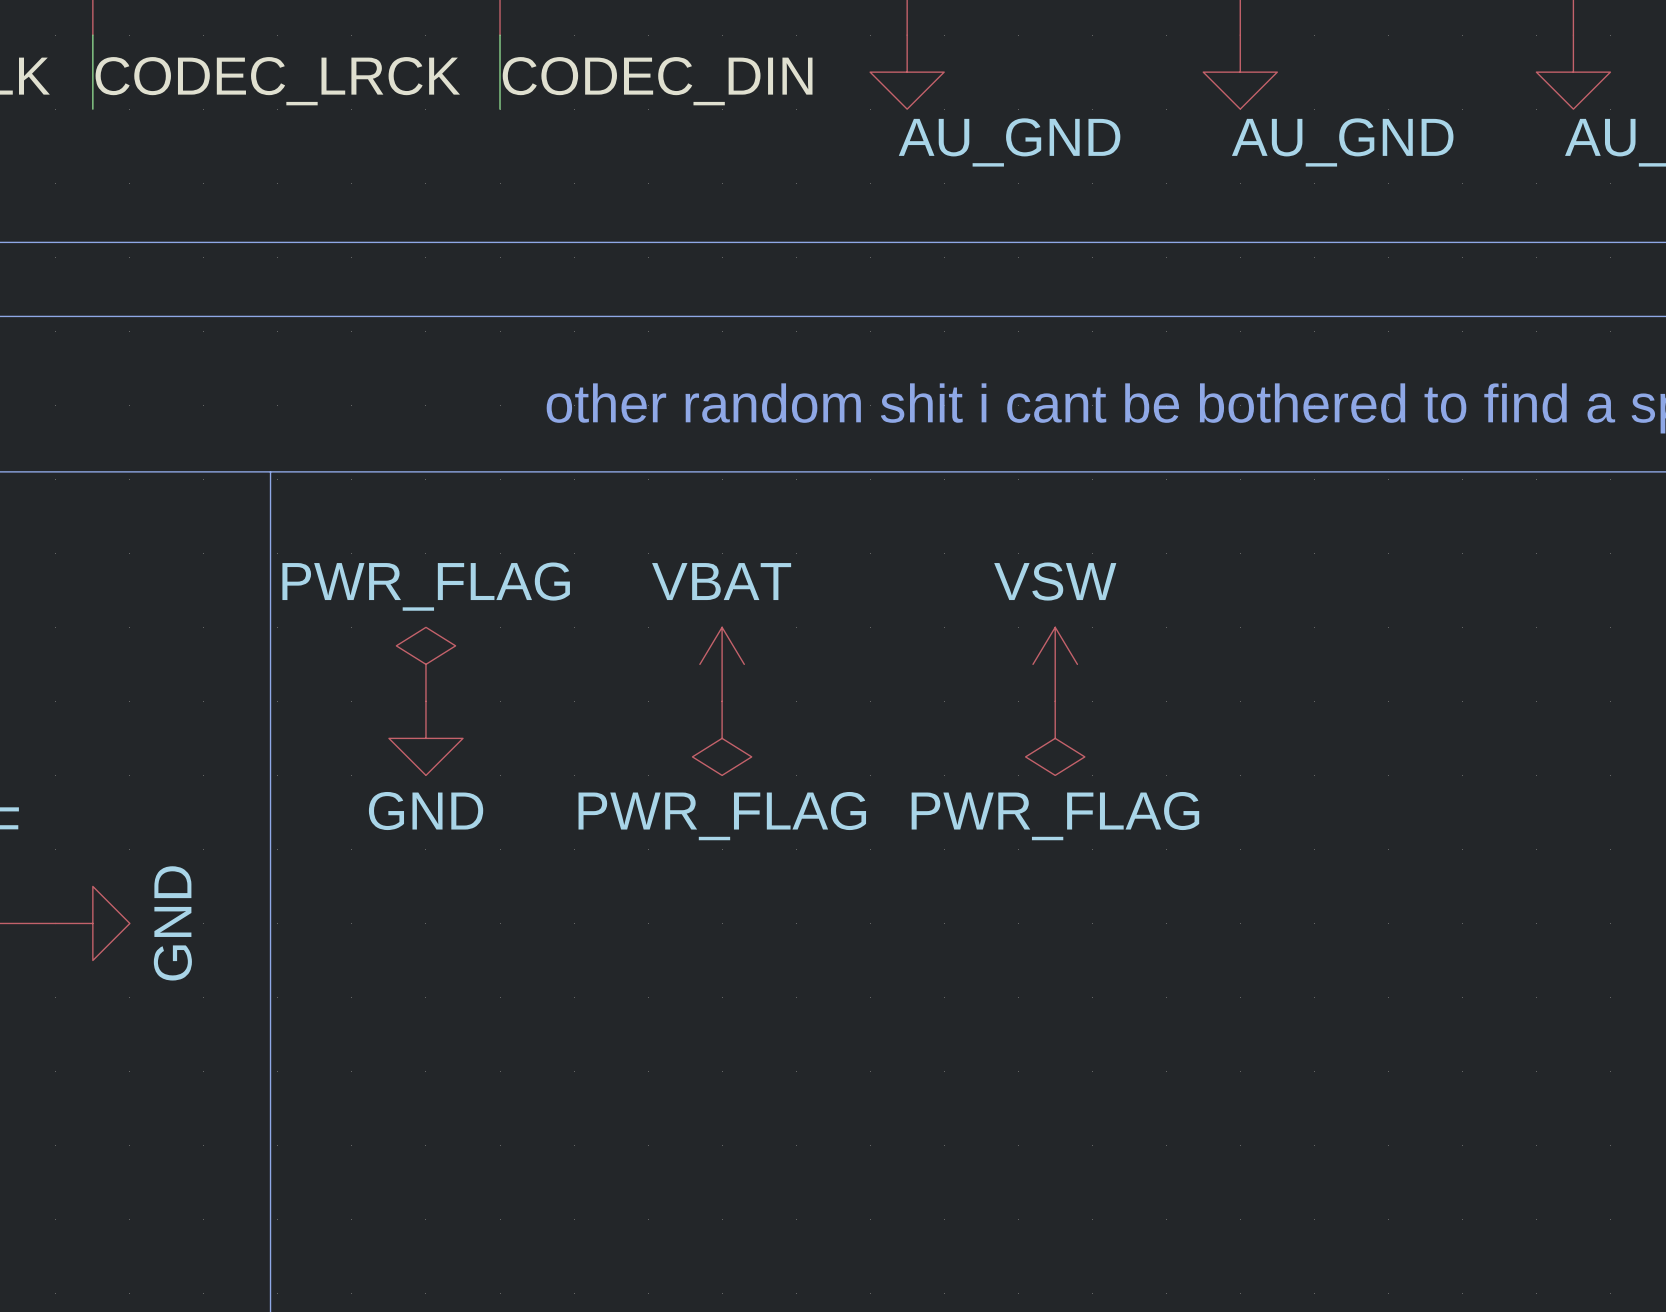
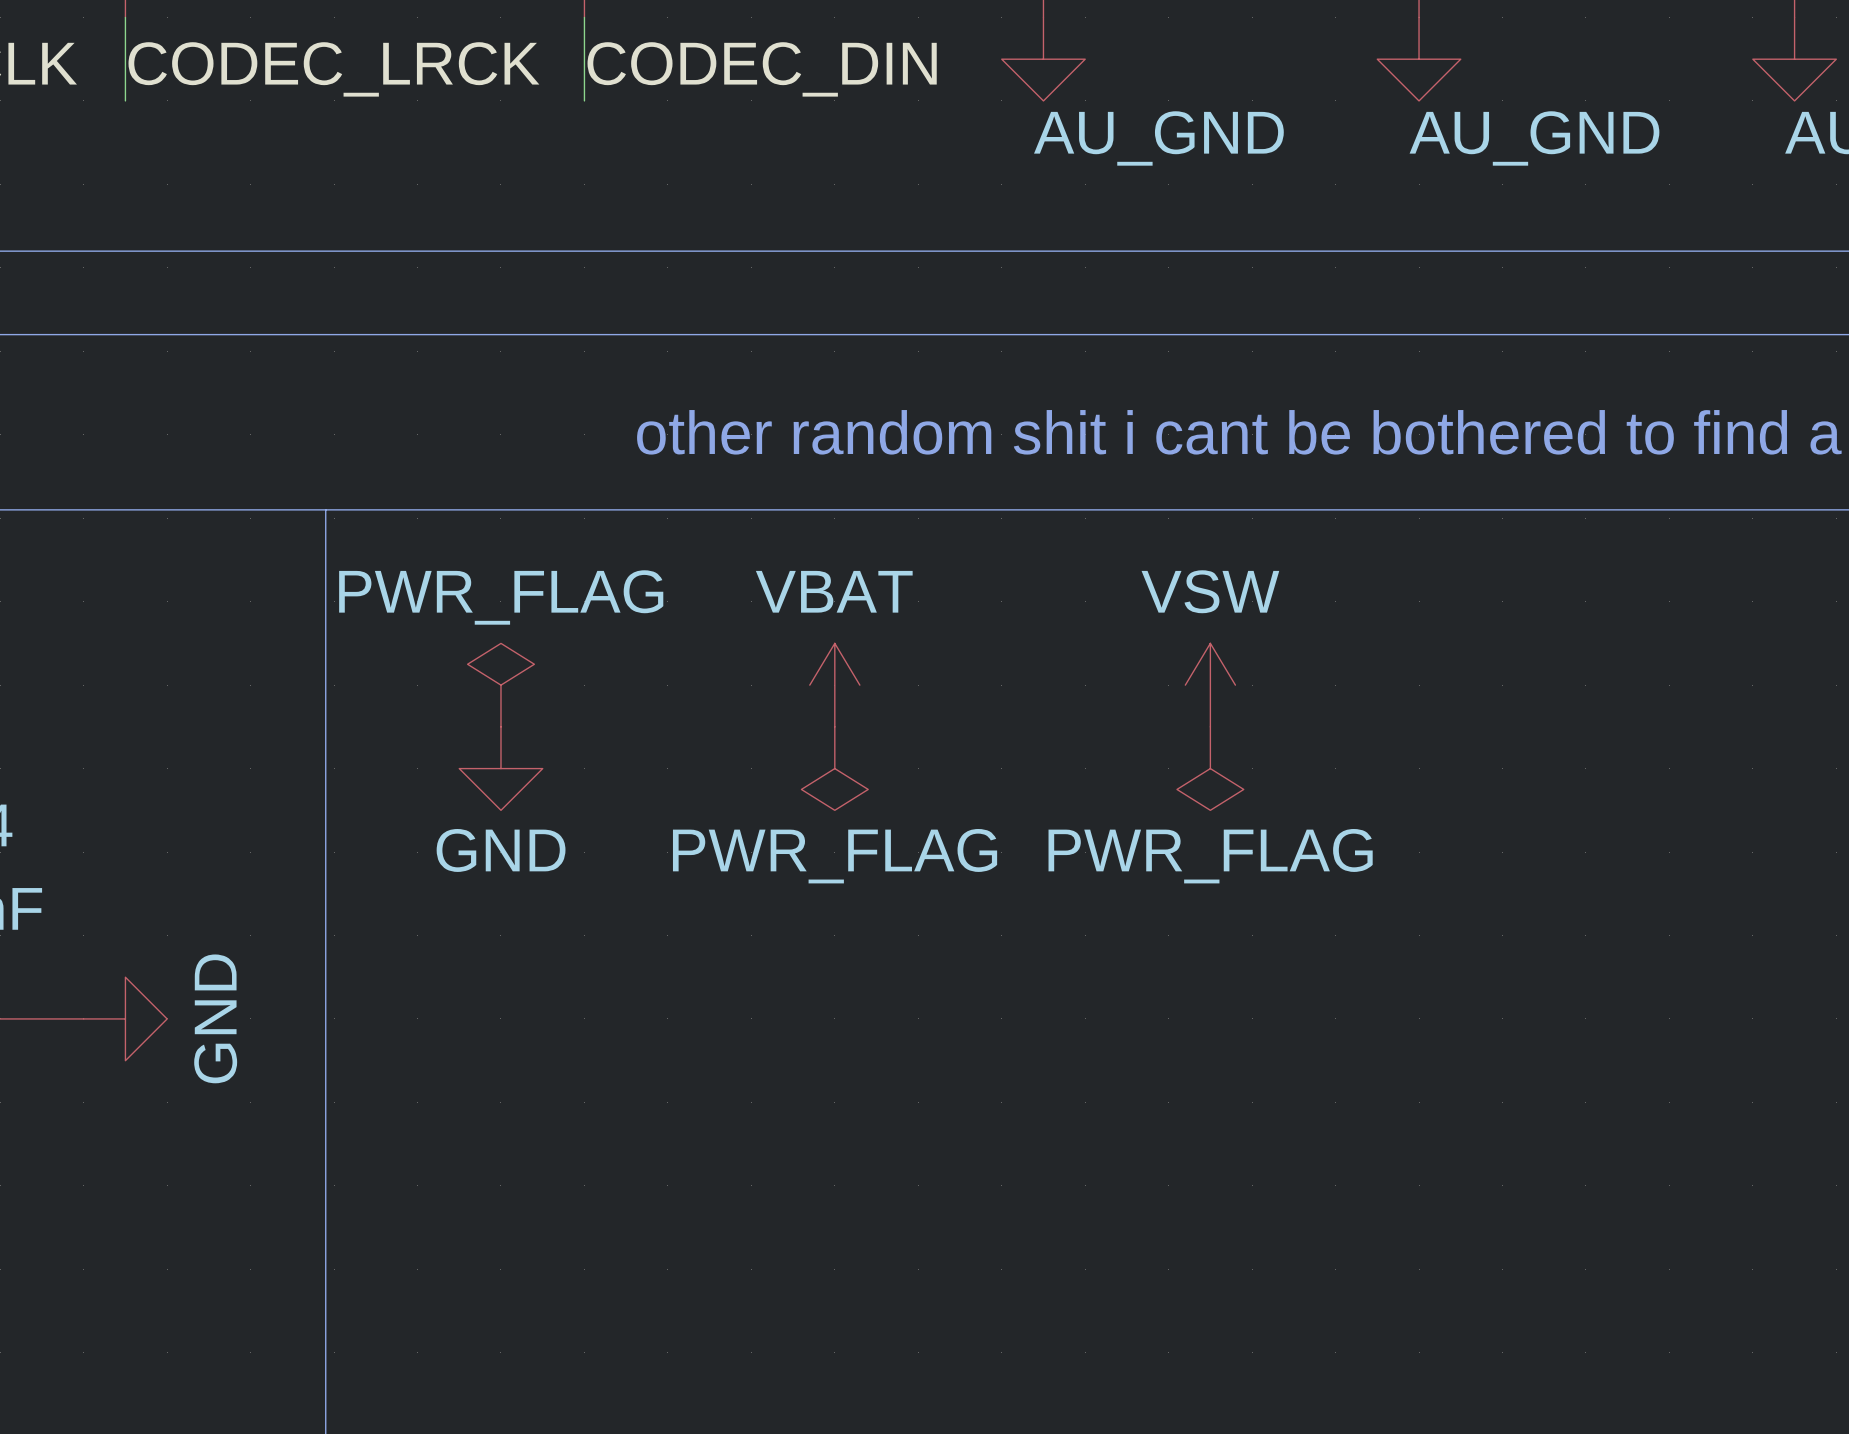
power symbol position: PWR_FLAG (425, 664) -> PWR_FLAG (500, 685)
power symbol position: VBAT (722, 664) -> VBAT (834, 685)
power symbol position: VSW (1055, 664) -> VSW (1210, 685)
power symbol position: GND (425, 738) -> GND (500, 768)
power symbol position: PWR_FLAG (722, 738) -> PWR_FLAG (834, 768)
power symbol position: PWR_FLAG (1055, 738) -> PWR_FLAG (1210, 768)

